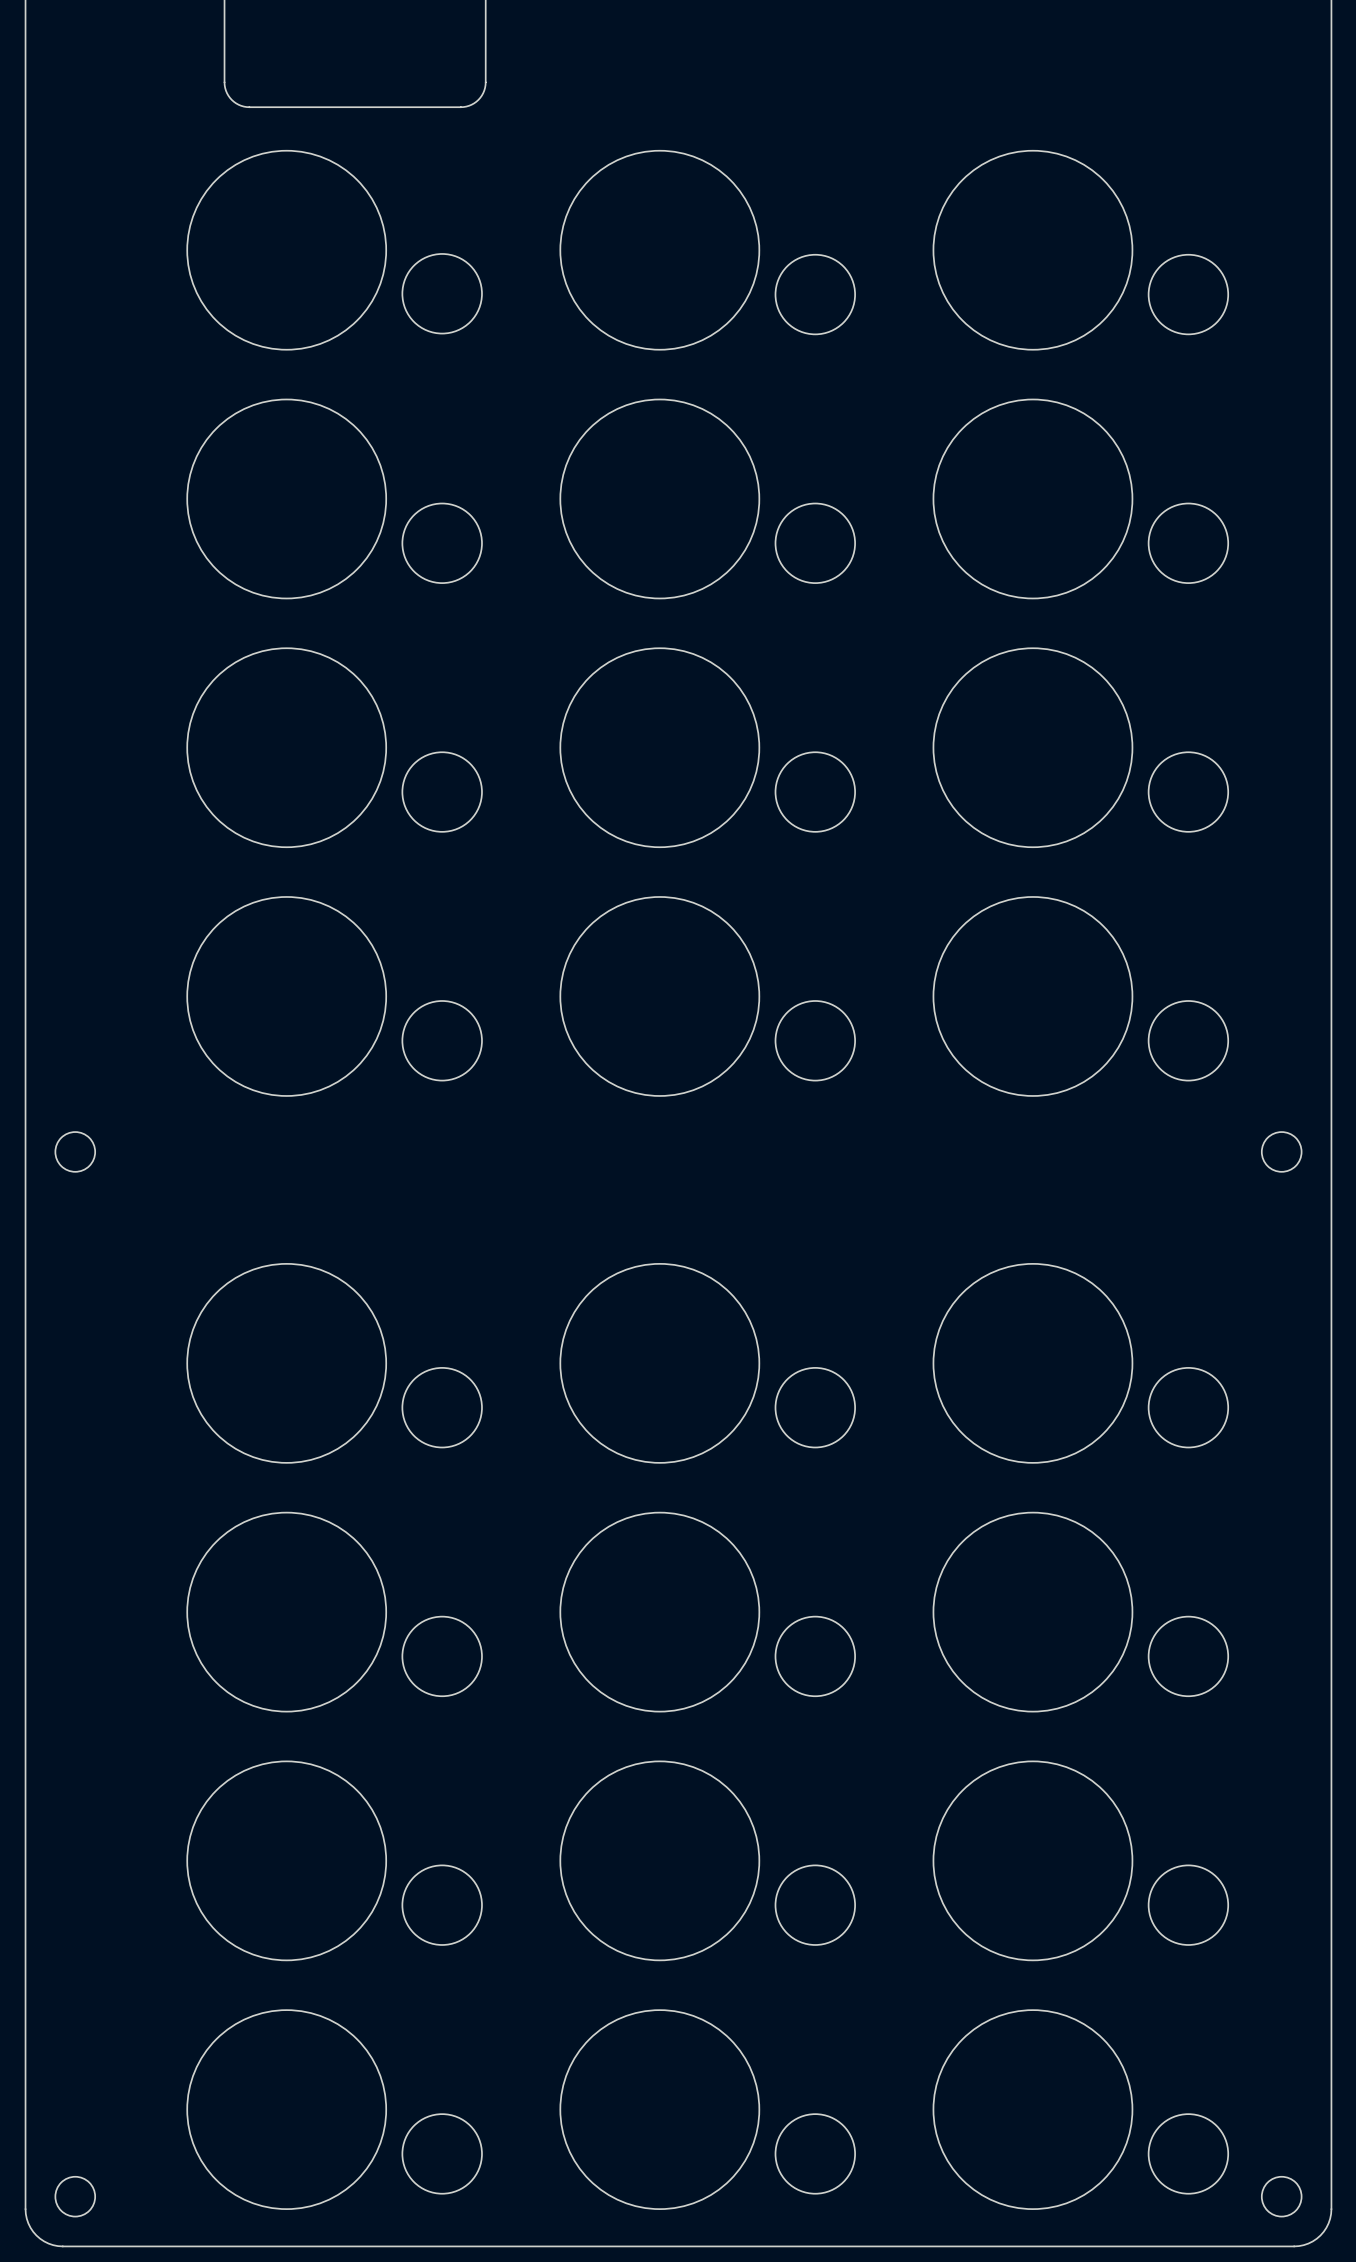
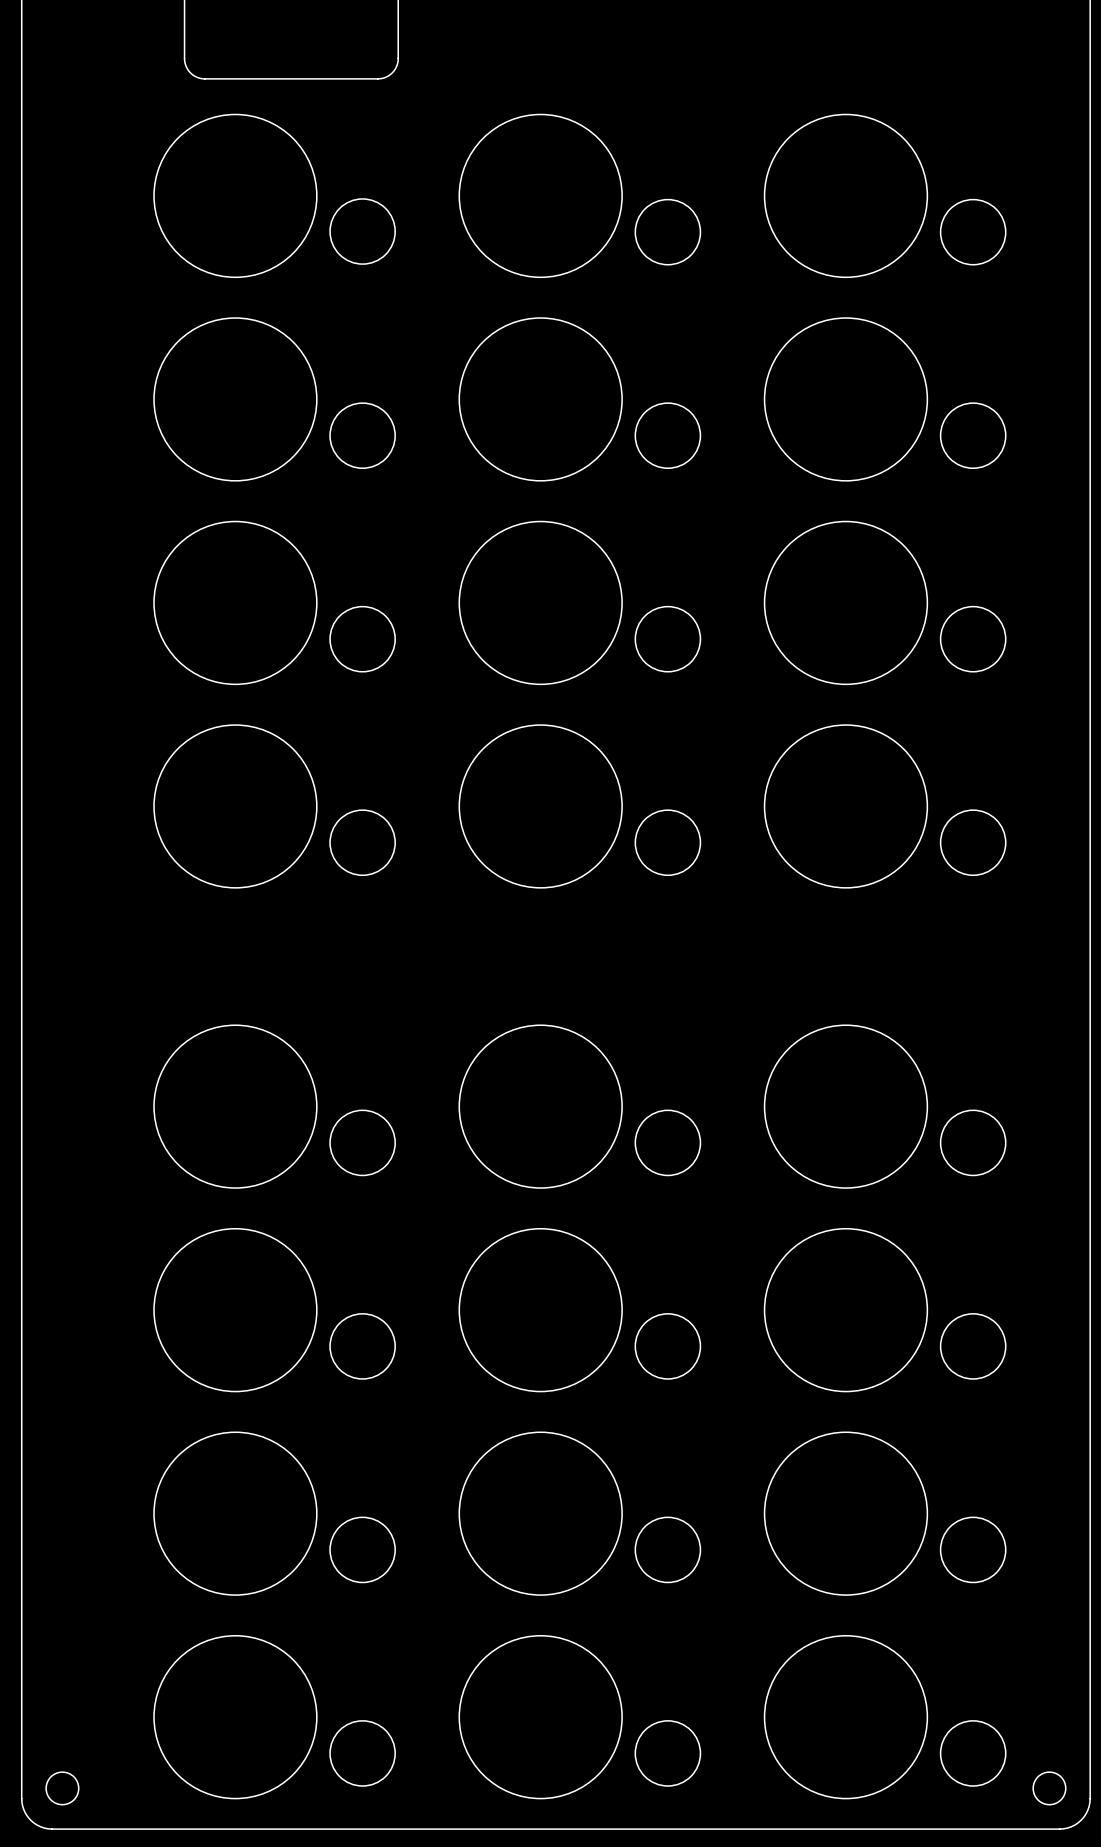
round board edge: [55, 1131, 96, 1173] -> none
round board edge: [1261, 1131, 1302, 1173] -> none

